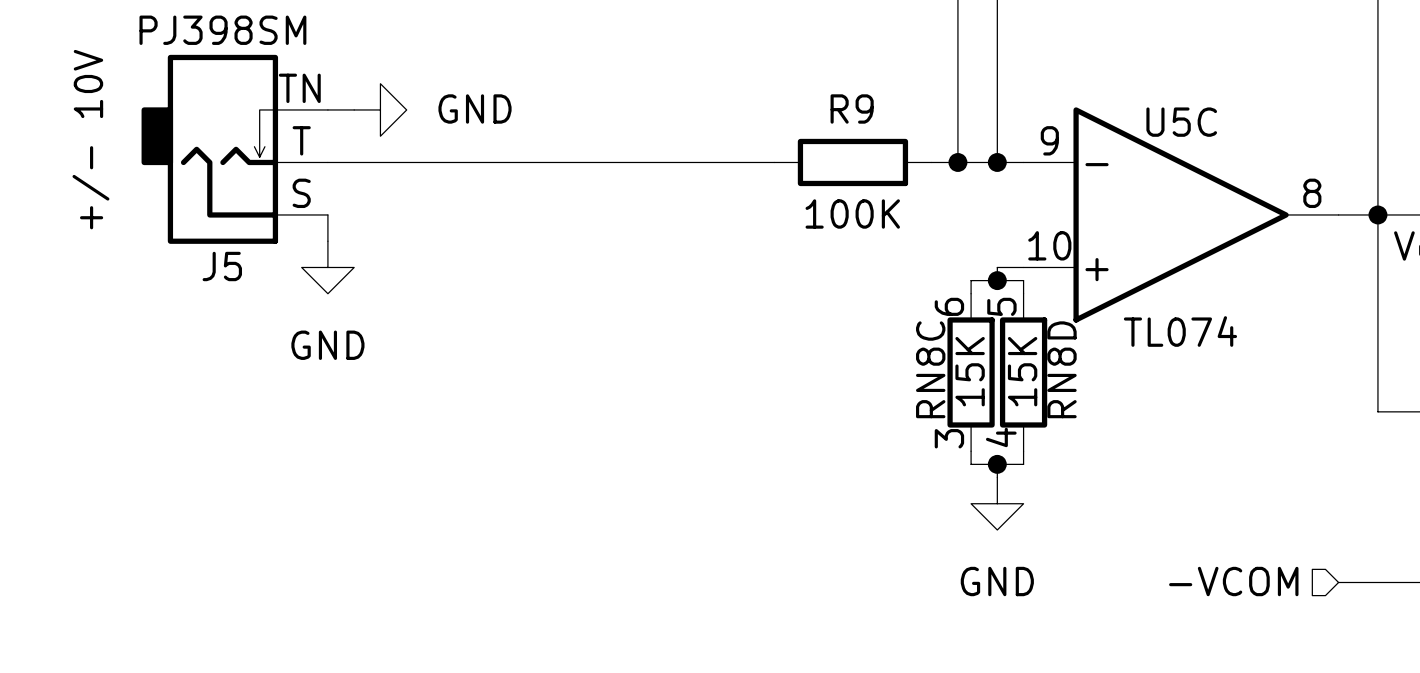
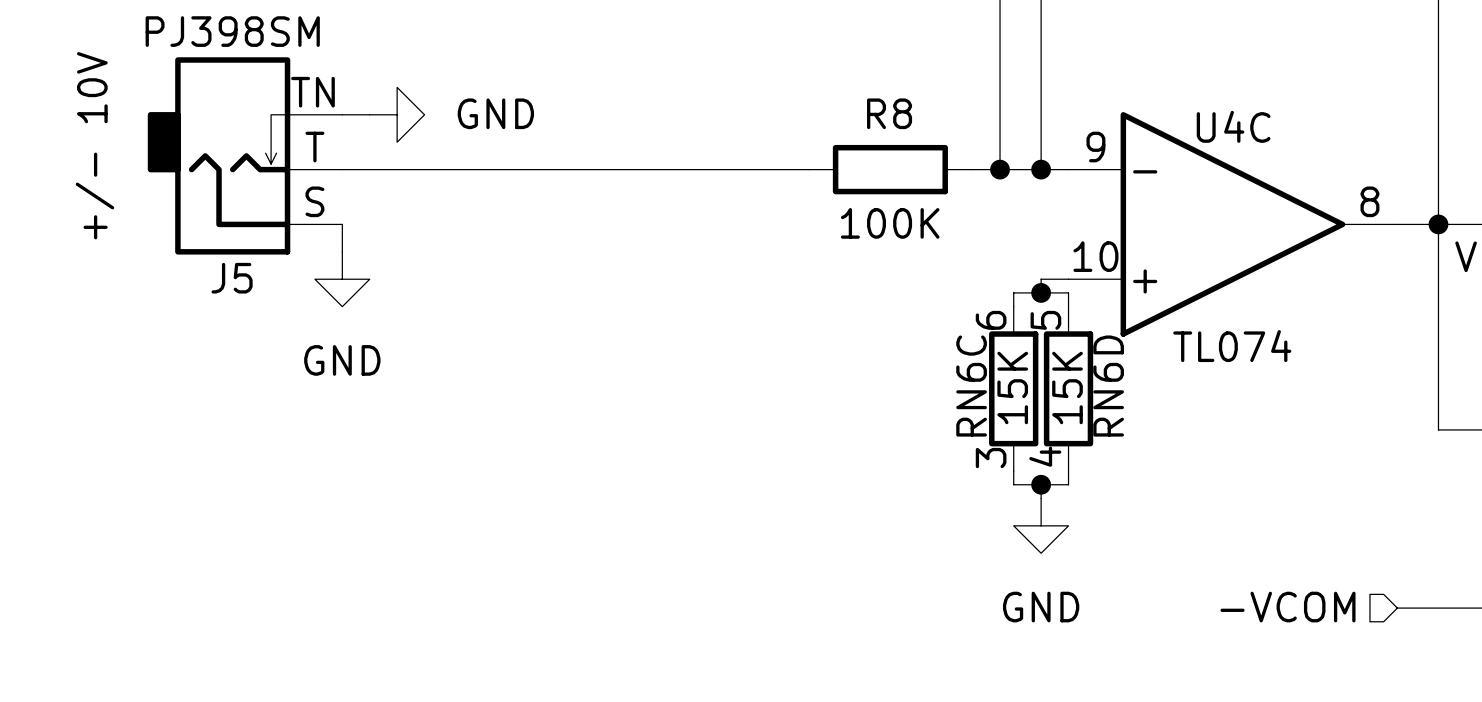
R9 name: R9 (852, 108) -> R8 (889, 113)
U5C name: U5C (1181, 122) -> U4C (1233, 126)
RN8C name: RN8C (930, 369) -> RN6C (971, 386)
RN8D name: RN8D (1061, 369) -> RN6D (1108, 386)

